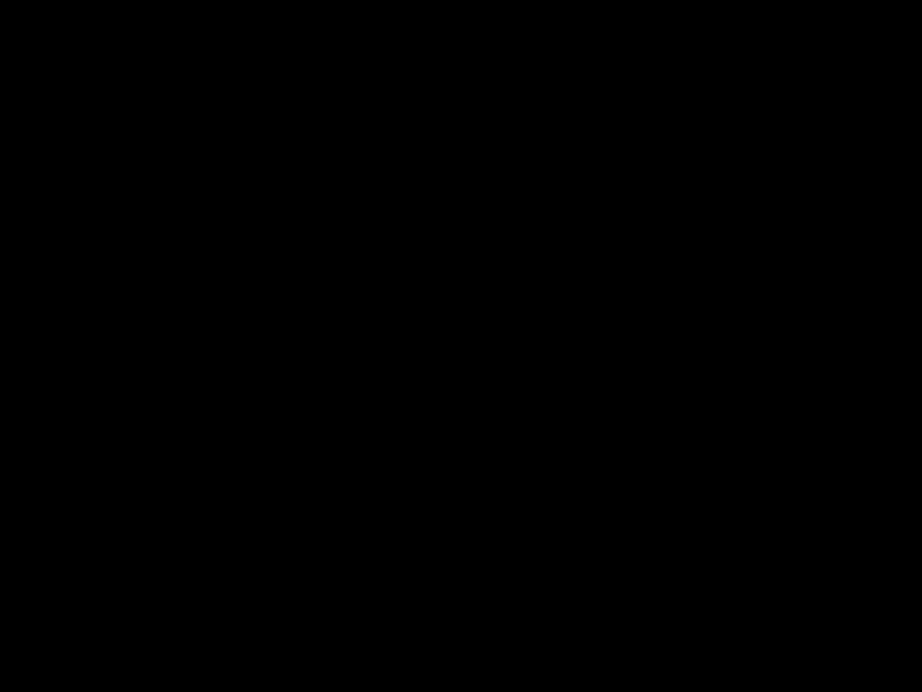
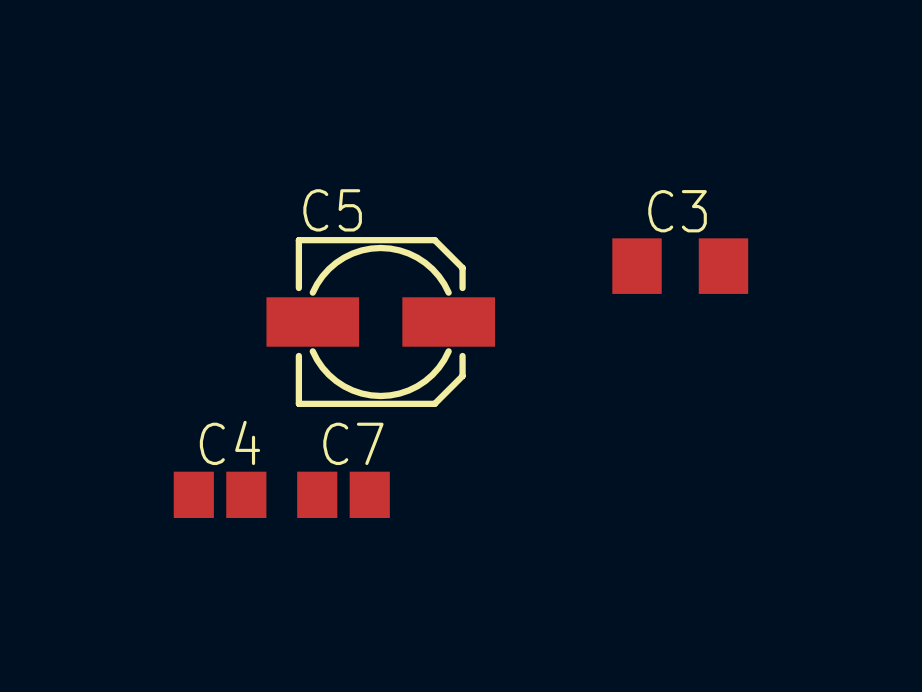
C3: none -> (680, 266)
C5: none -> (380, 322)
C4: none -> (220, 494)
C7: none -> (343, 494)

